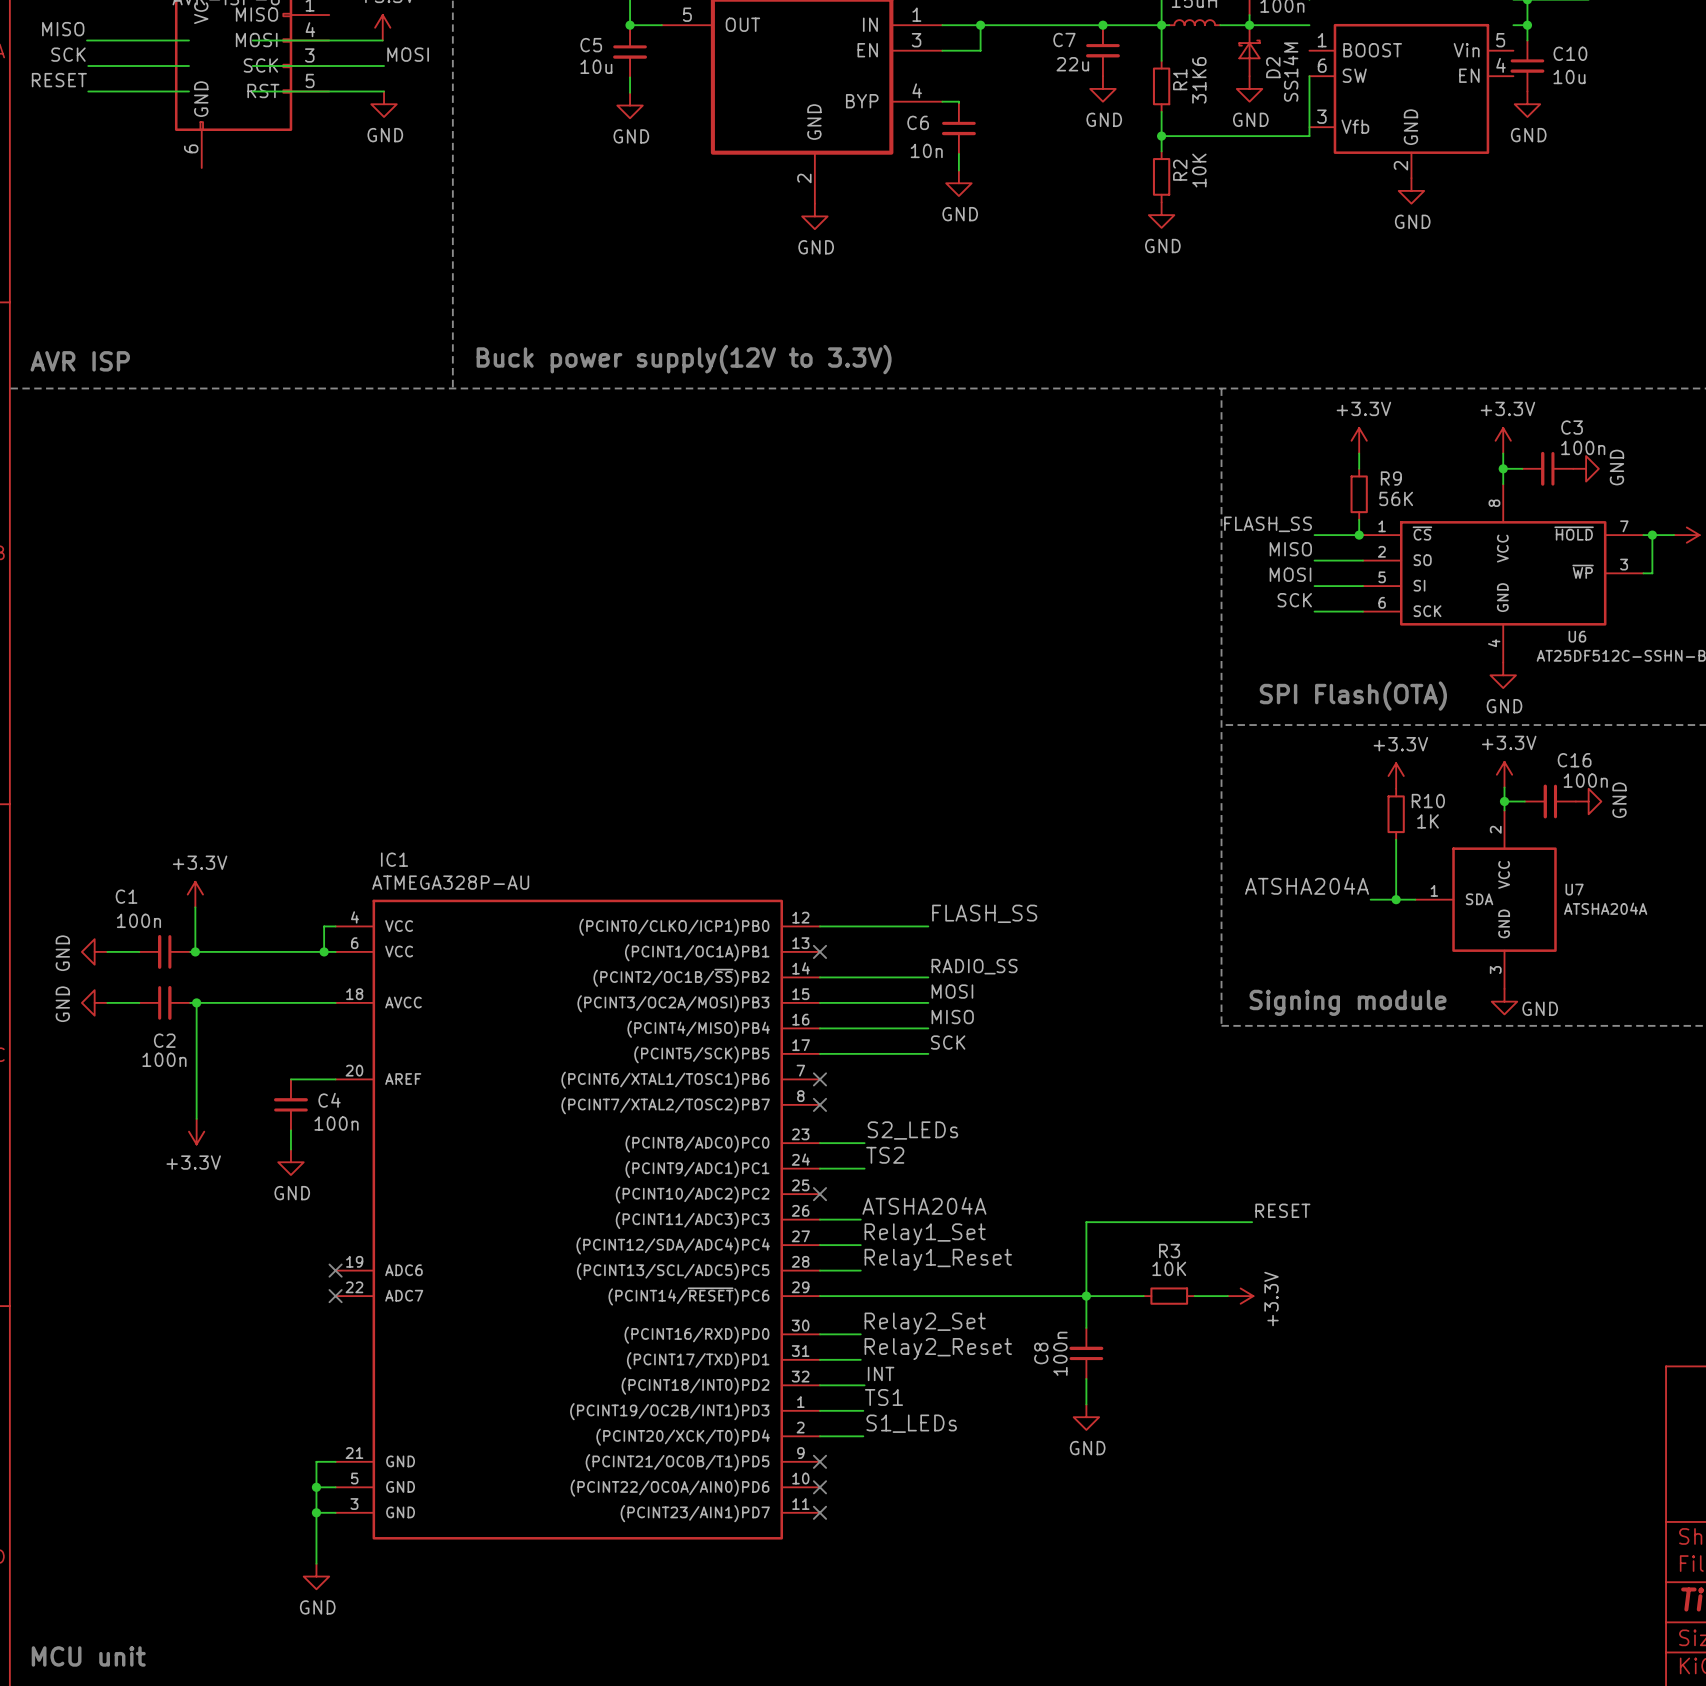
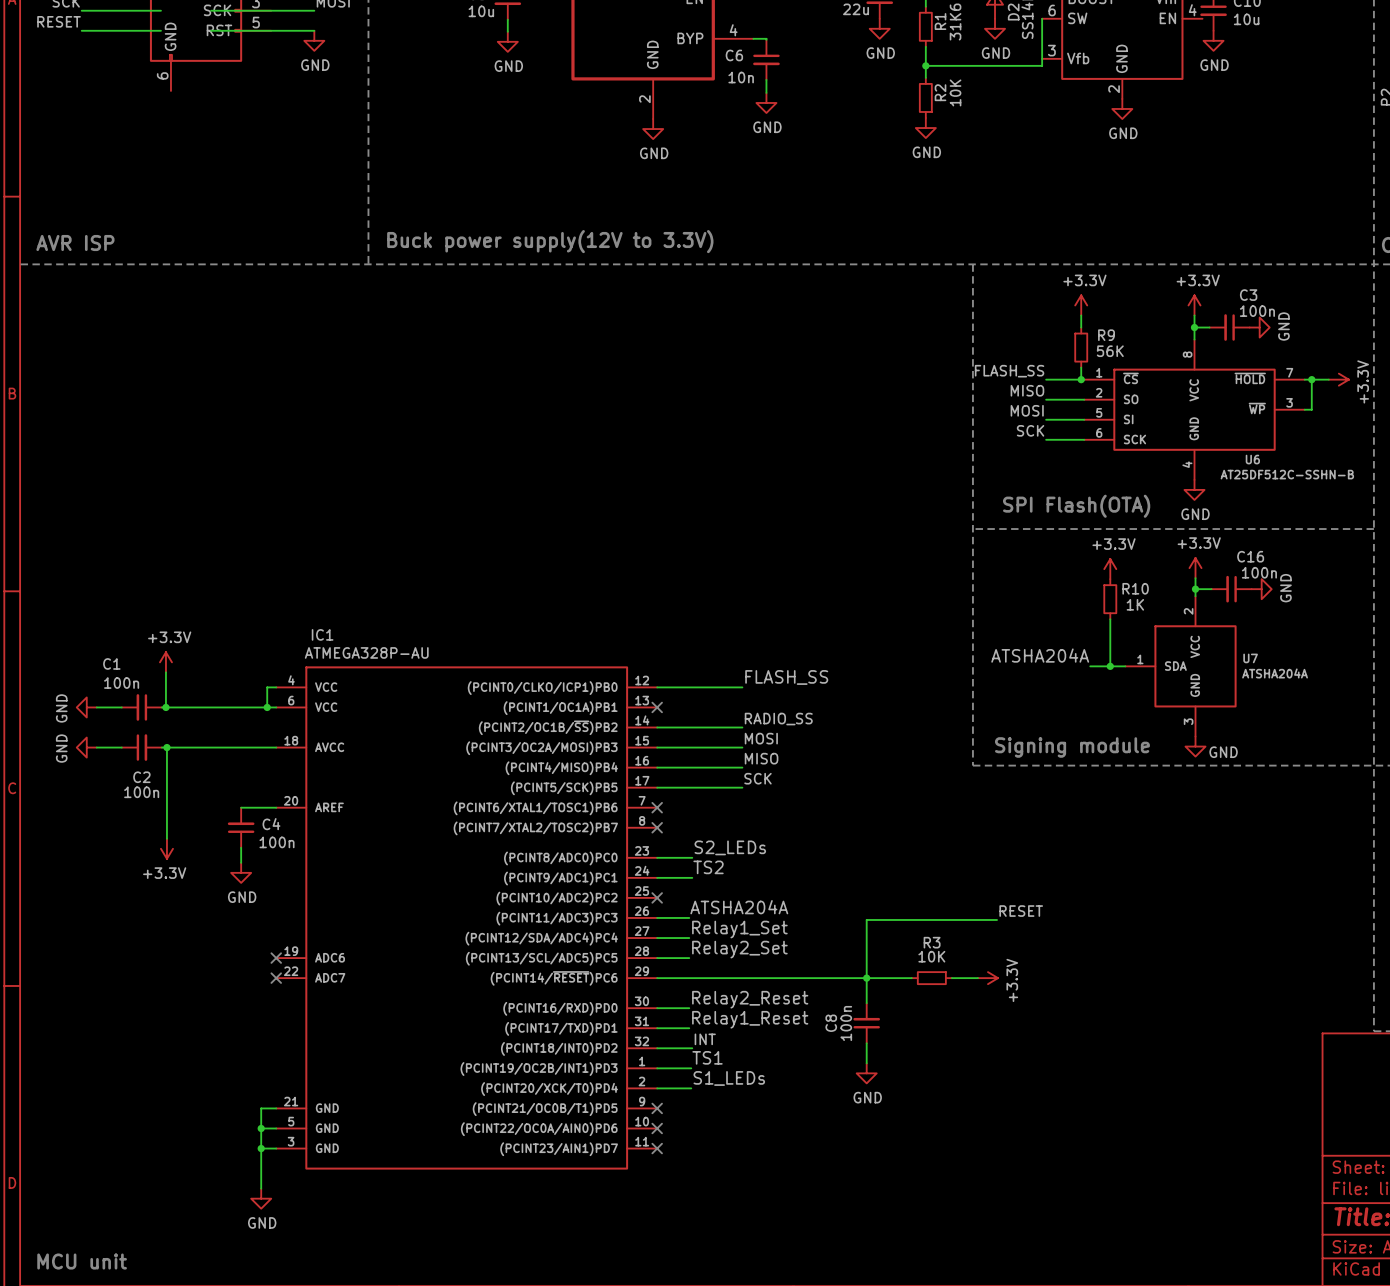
label: Relay1_Reset (938, 1259) -> Relay2_Set (739, 949)
label: Relay2_Set (925, 1323) -> Relay2_Reset (750, 999)
label: Relay2_Reset (938, 1349) -> Relay1_Reset (750, 1019)

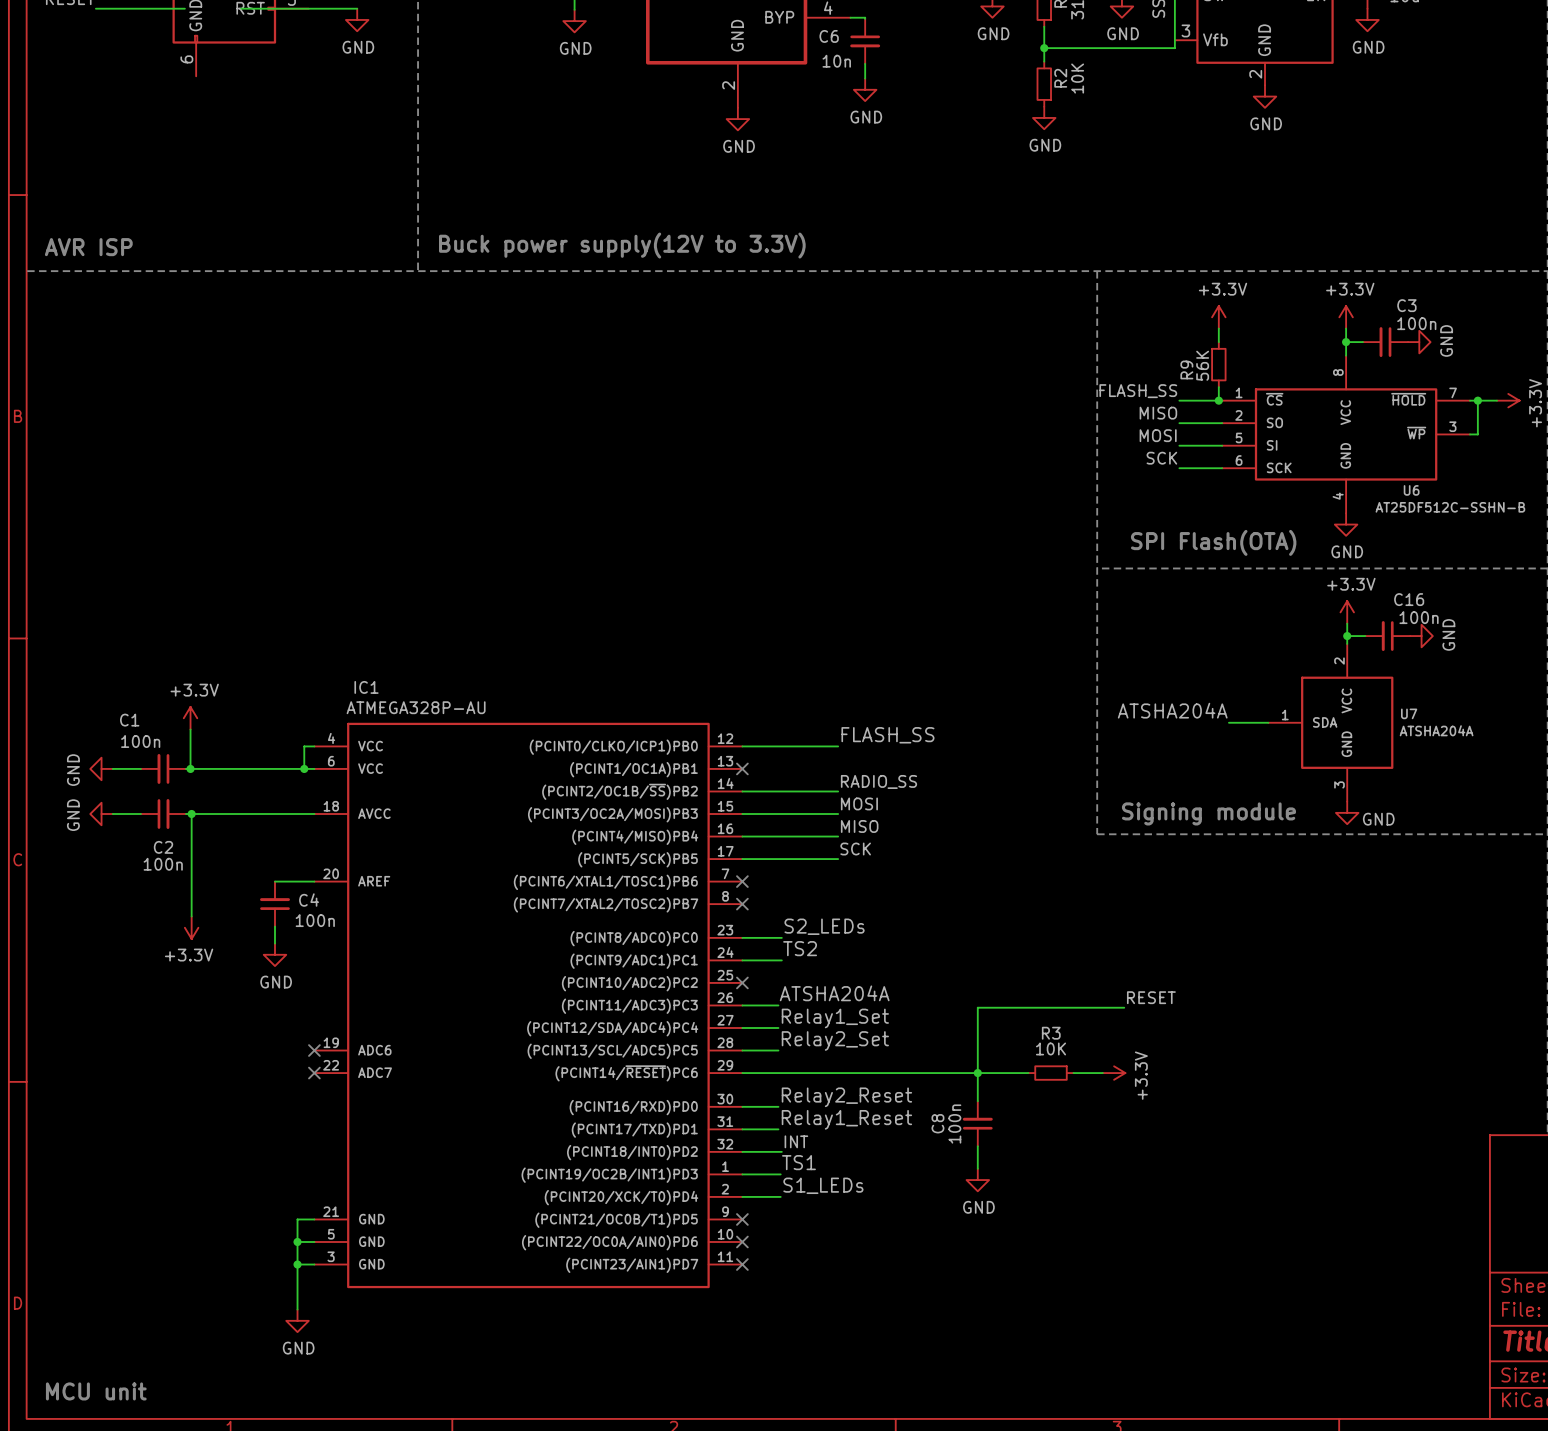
R9 name rotation: 0° (1106, 335) -> 90° counterclockwise (1186, 369)
R9 name position: R9 (1106, 335) -> R9 (1186, 369)
R9 value rotation: 0° (1110, 351) -> 90° counterclockwise (1202, 365)
R9 value position: 56K (1110, 351) -> 56K (1202, 365)
power symbol: +3.3V (1110, 569) -> none
R10: 1K (1110, 599) -> none
wire: (1110, 619) (1110, 666) -> none
junction: (1110, 666) -> none

